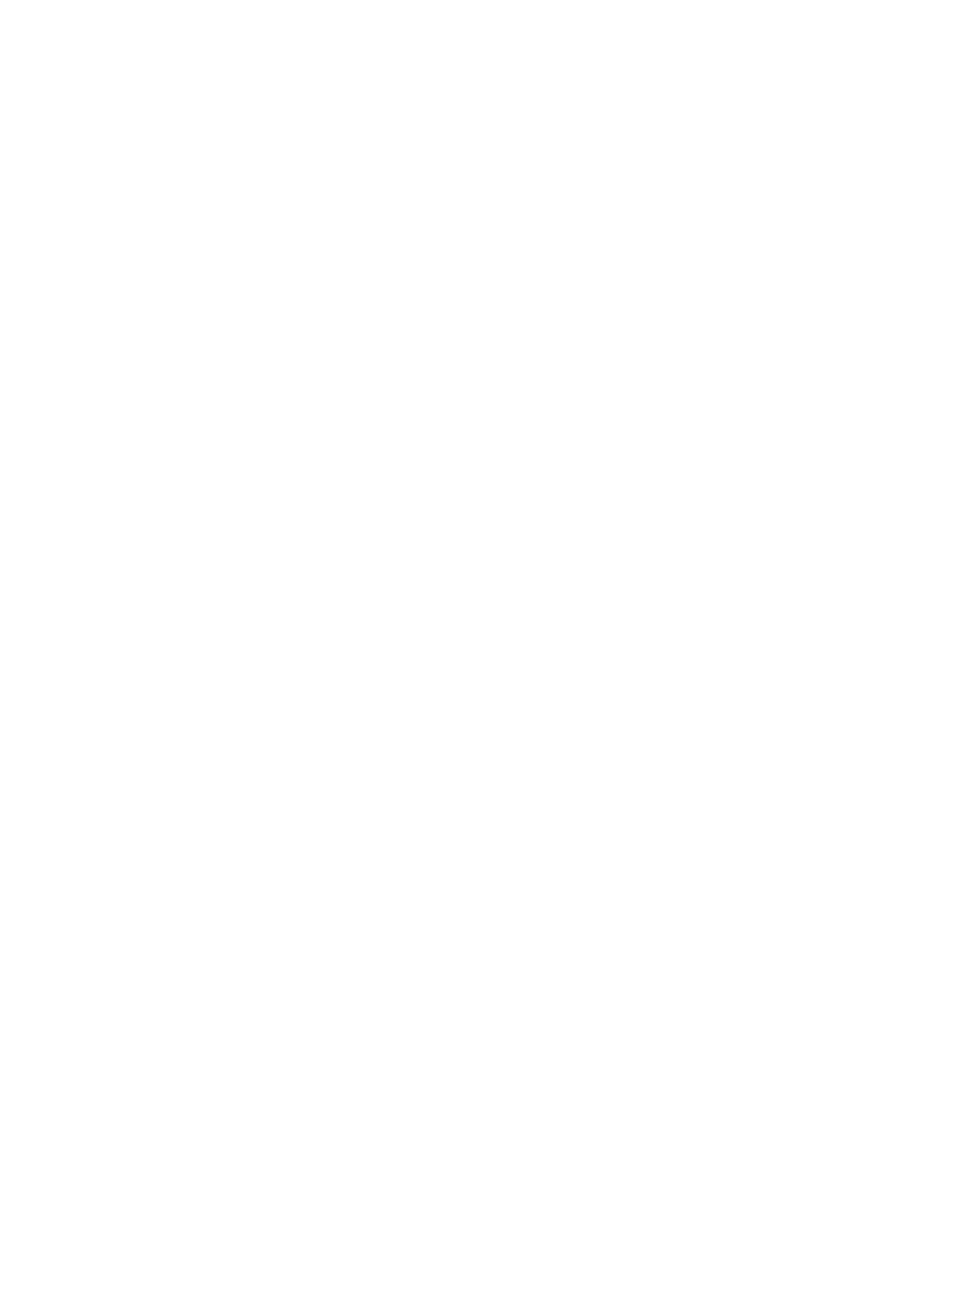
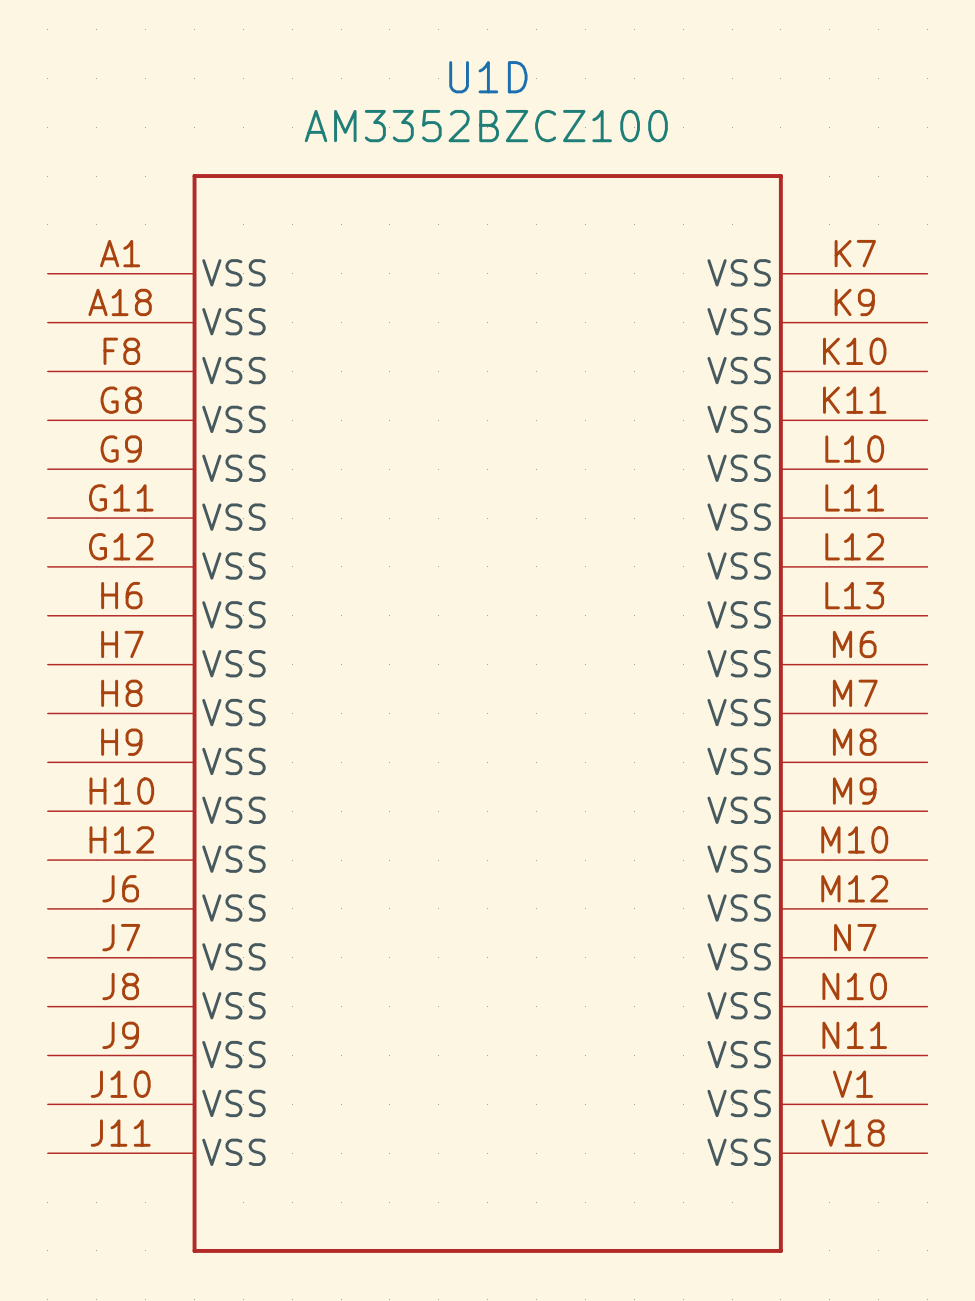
U1D: none -> AM3352BZCZ100 (487, 713)

